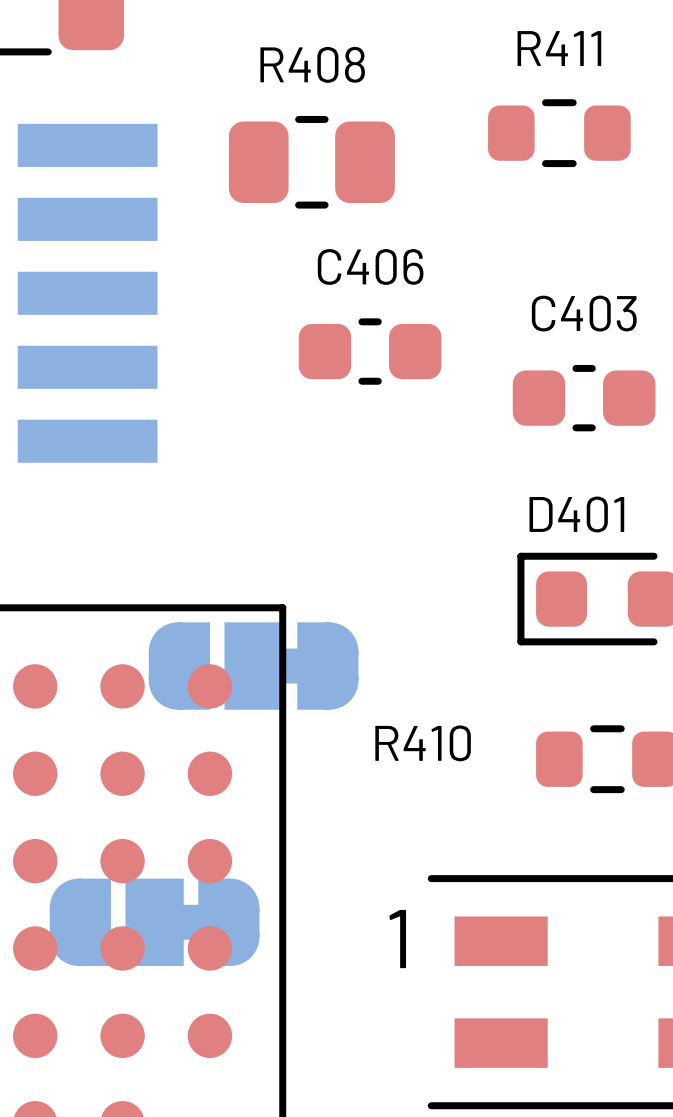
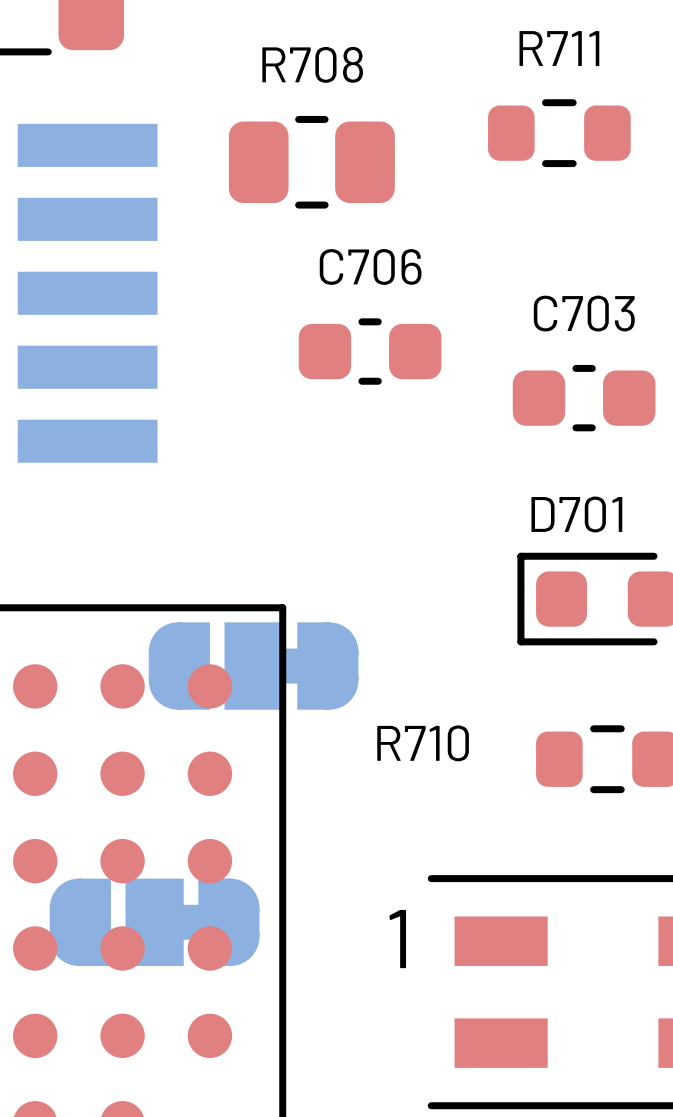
R411 name: R411 (559, 48) -> R711 (559, 48)
R408 name: R408 (312, 64) -> R708 (312, 64)
C406 name: C406 (370, 266) -> C706 (370, 266)
C403 name: C403 (584, 313) -> C703 (584, 313)
D401 name: D401 (576, 514) -> D701 (576, 514)
R410 name: R410 (423, 743) -> R710 (423, 743)

